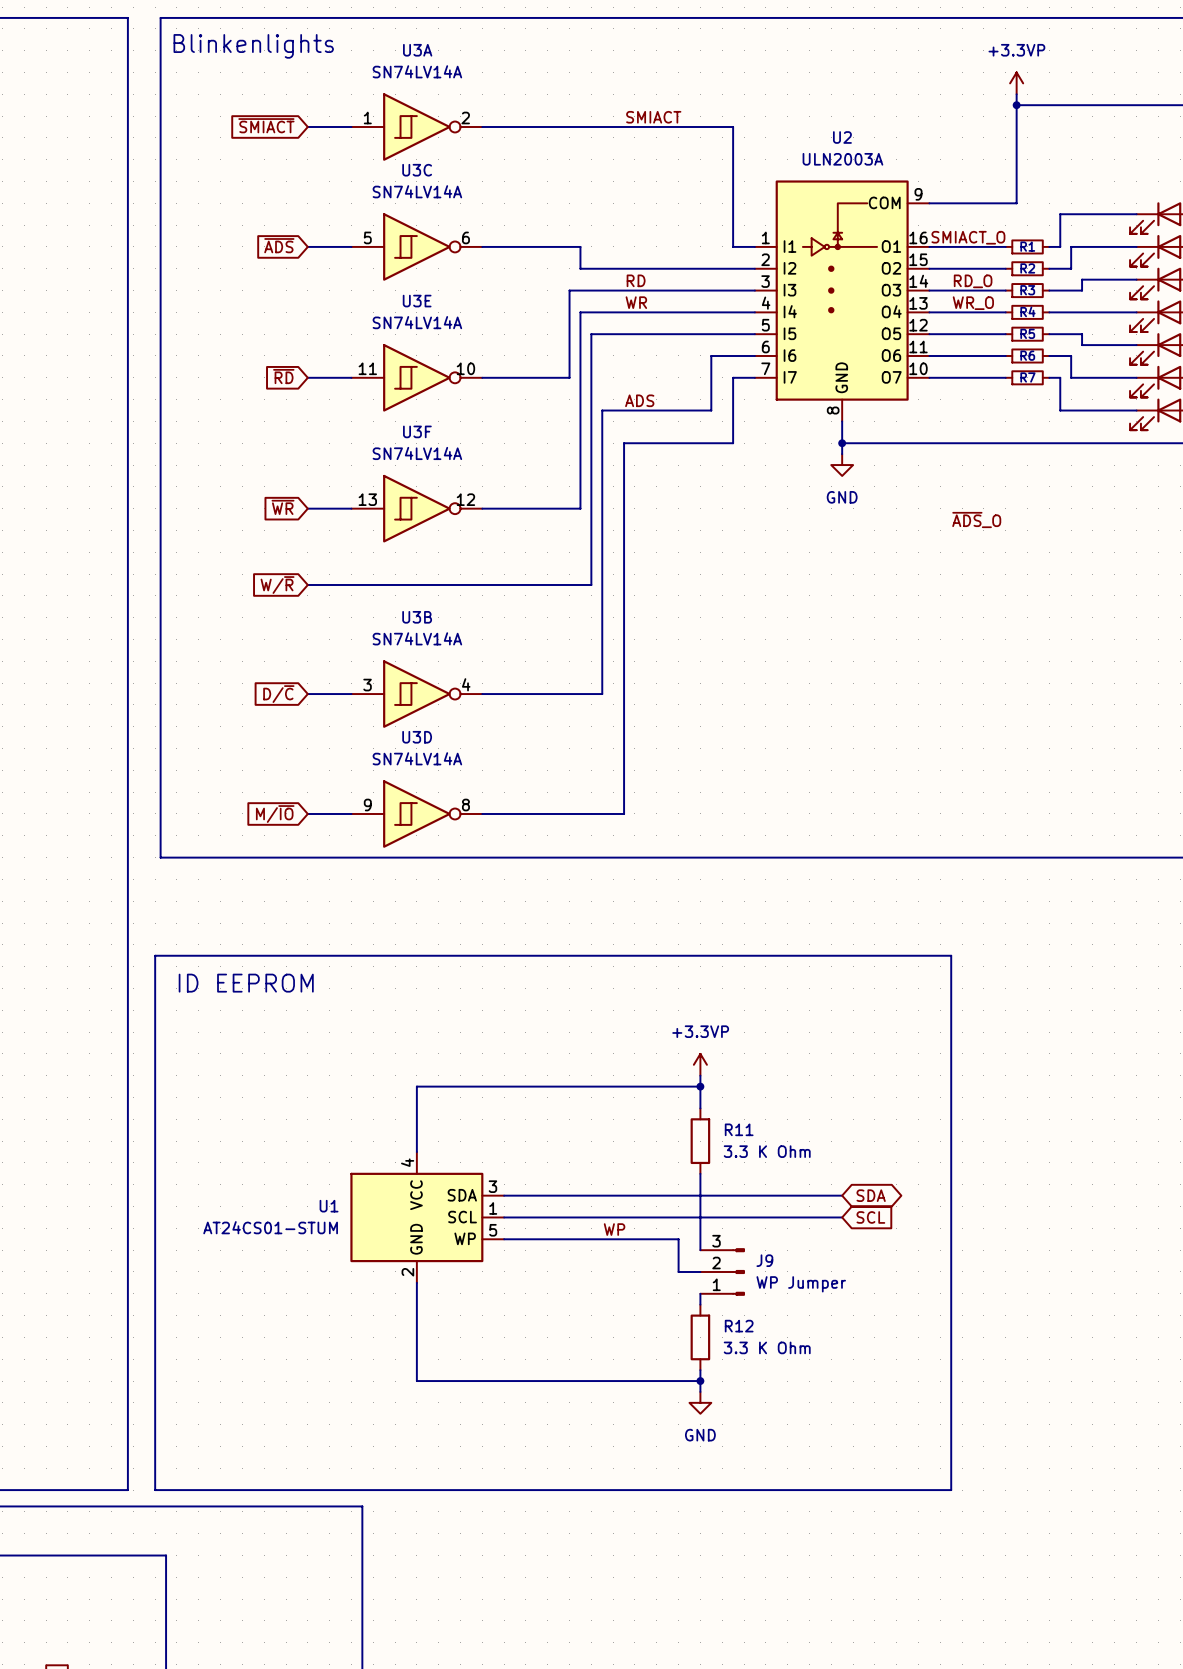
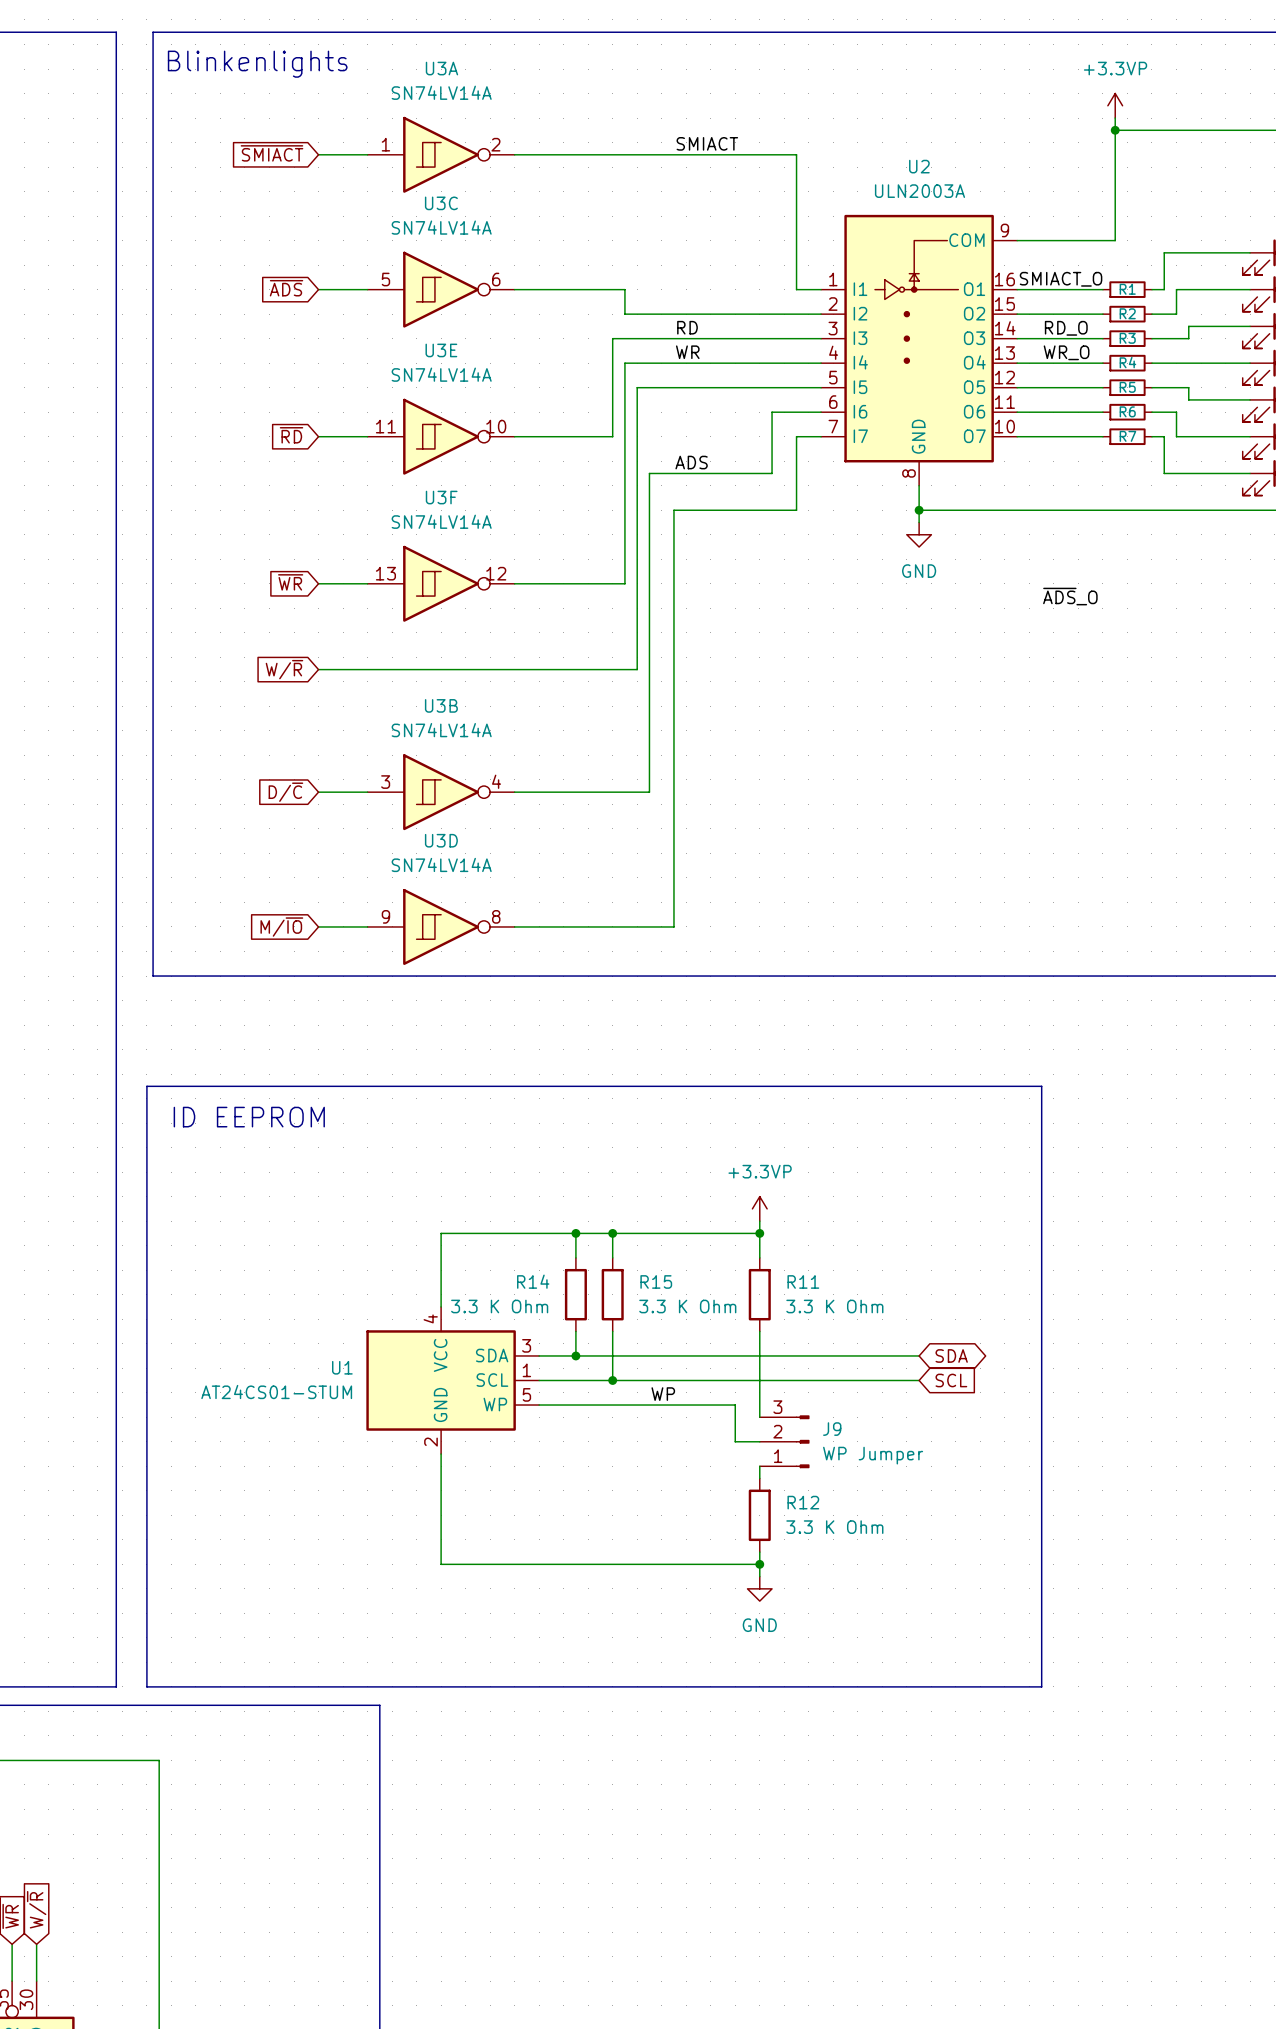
wire: none -> (575, 1233) (575, 1257)
junction: none -> (575, 1233)
wire: none -> (612, 1233) (612, 1257)
junction: none -> (612, 1233)
R14: none -> 3.3 K Ohm (575, 1294)
R15: none -> 3.3 K Ohm (612, 1294)
wire: none -> (575, 1331) (575, 1355)
wire: none -> (612, 1331) (612, 1380)
junction: none -> (575, 1355)
junction: none -> (612, 1380)

